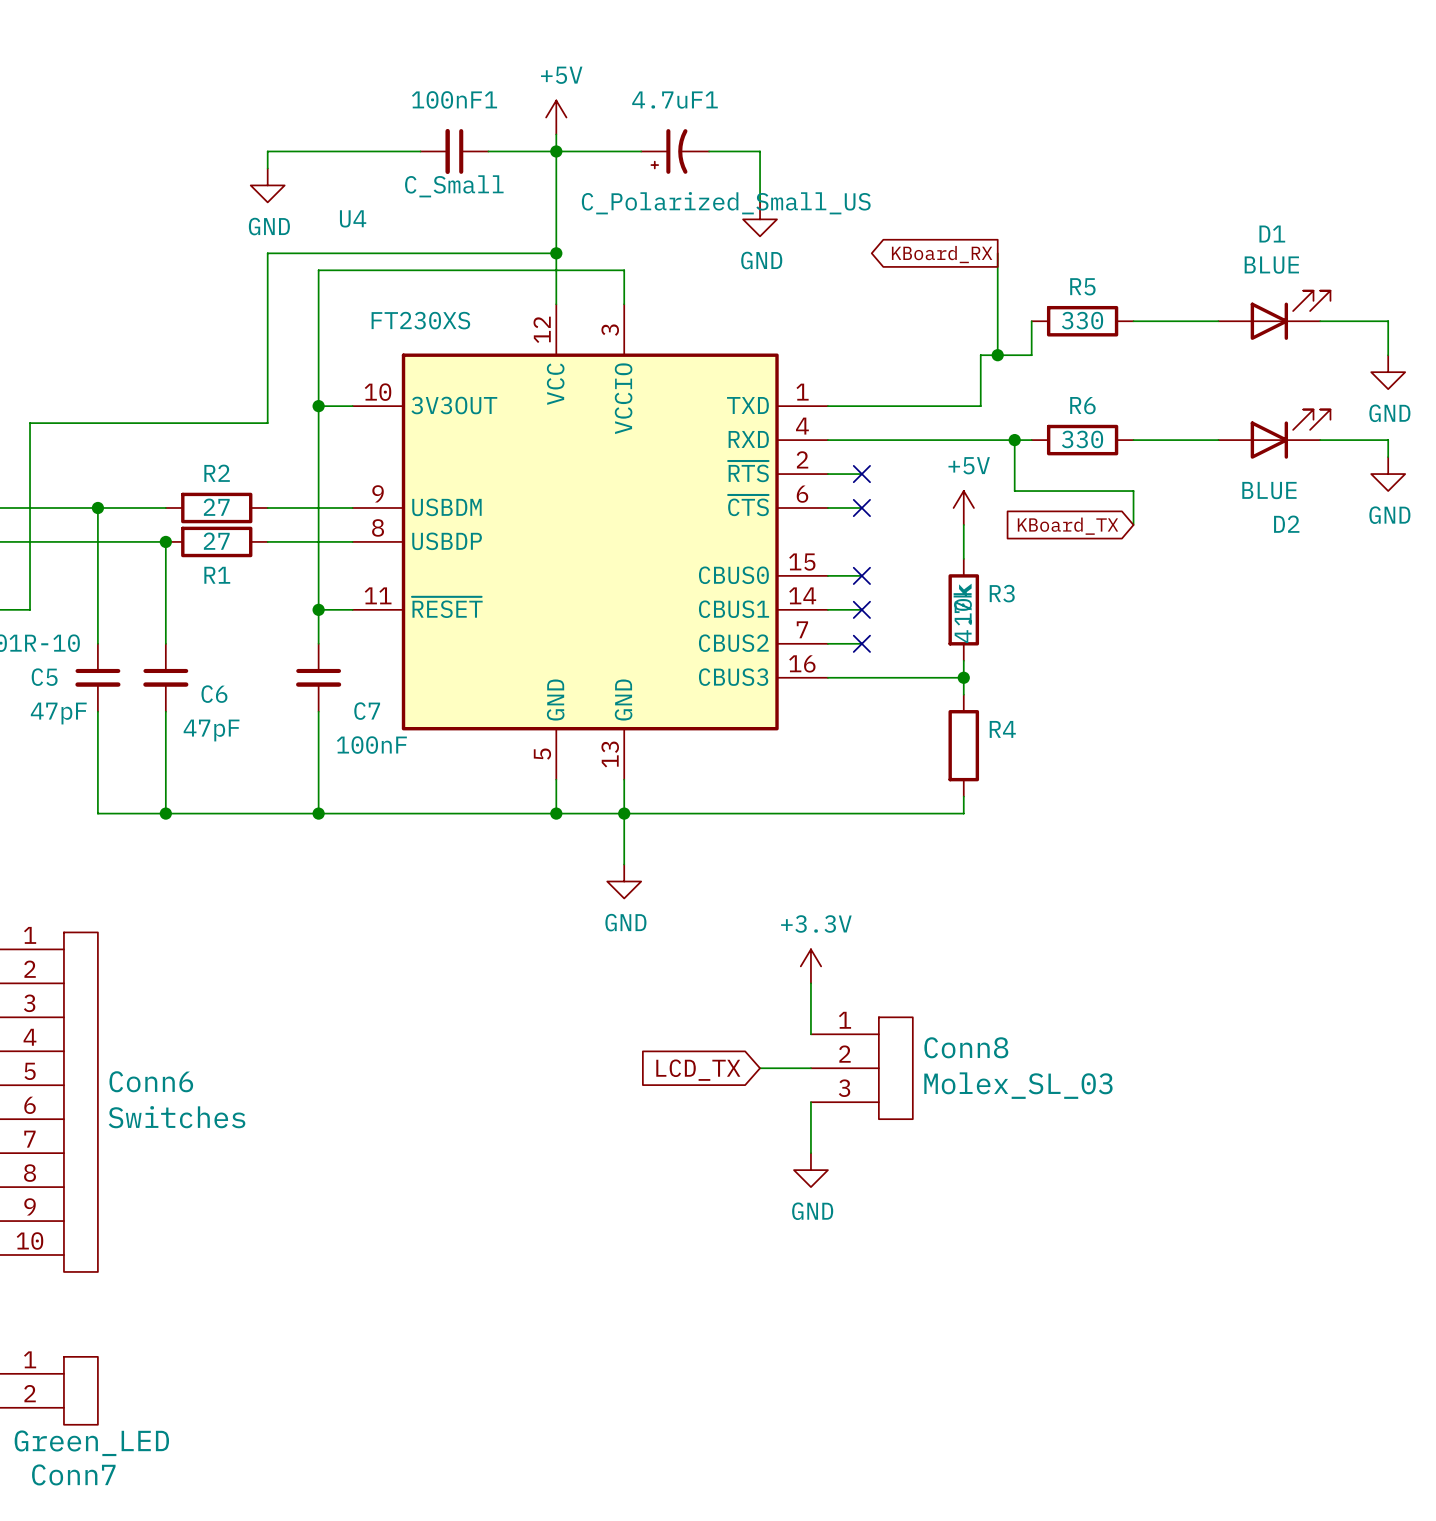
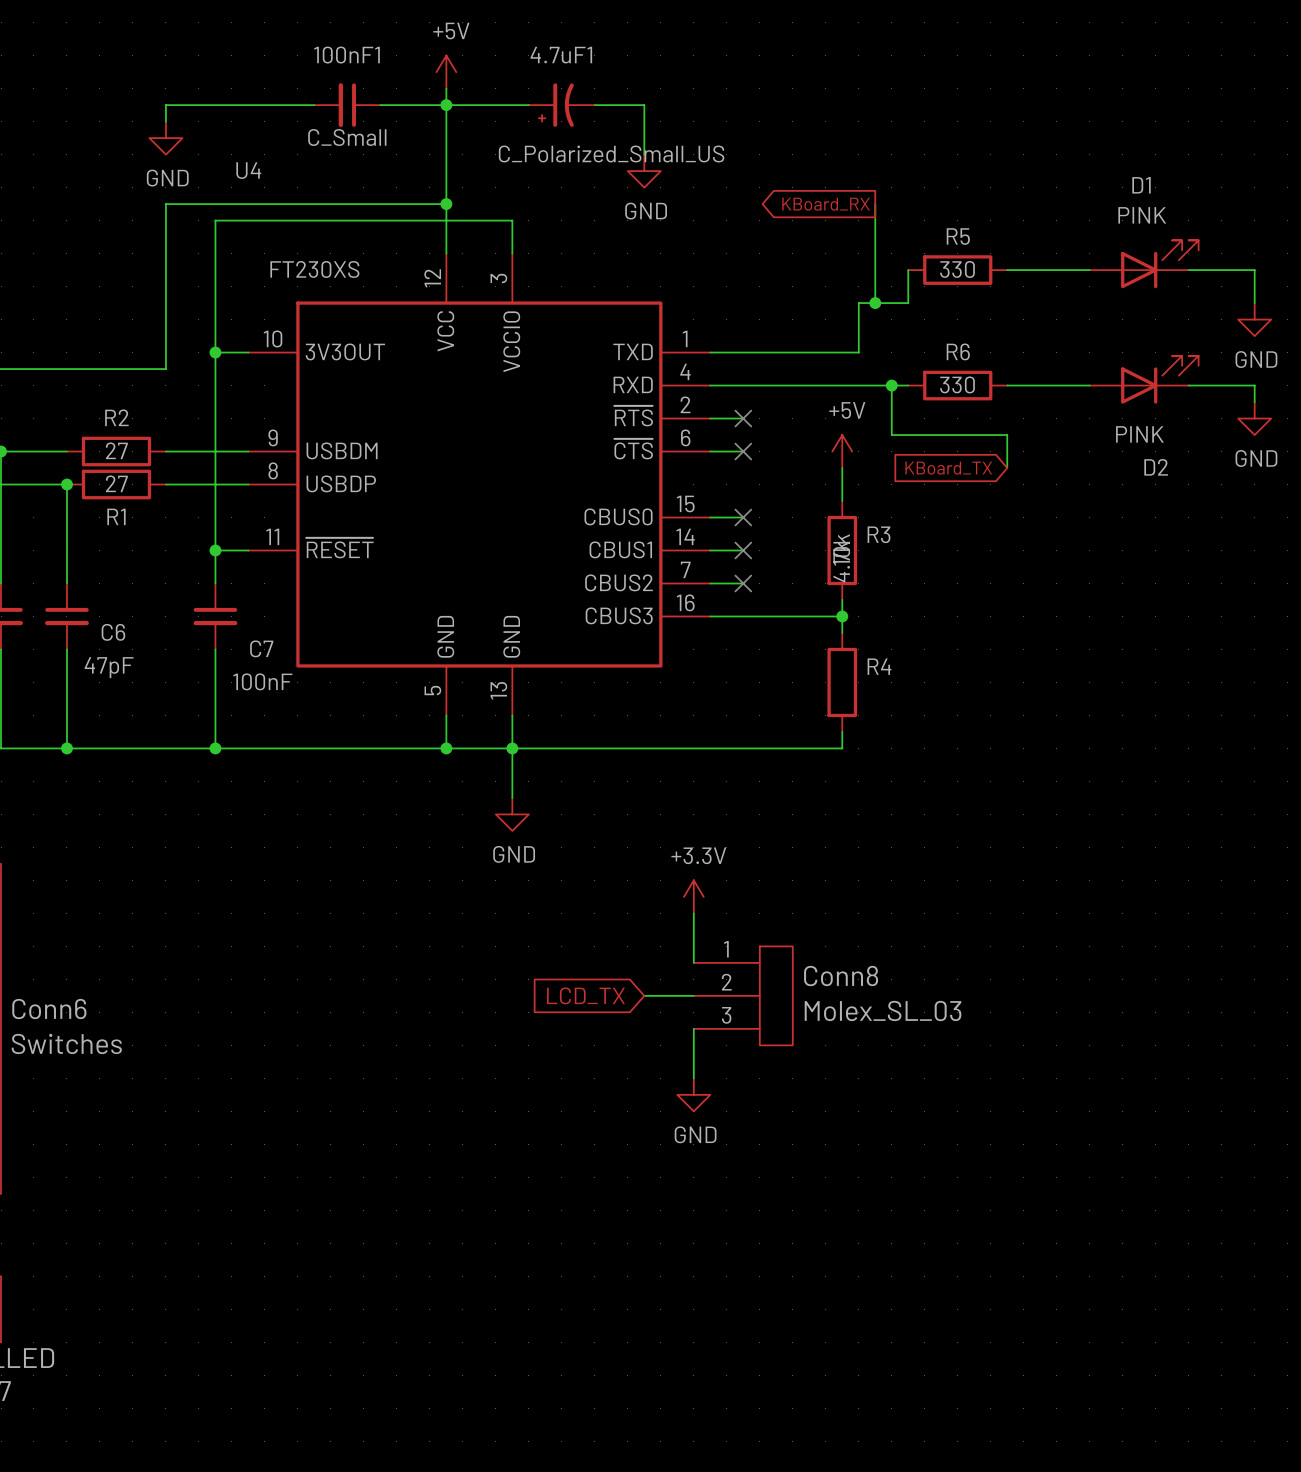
D1 value: BLUE (1271, 265) -> PINK (1142, 215)
D2 value: BLUE (1269, 490) -> PINK (1139, 434)

